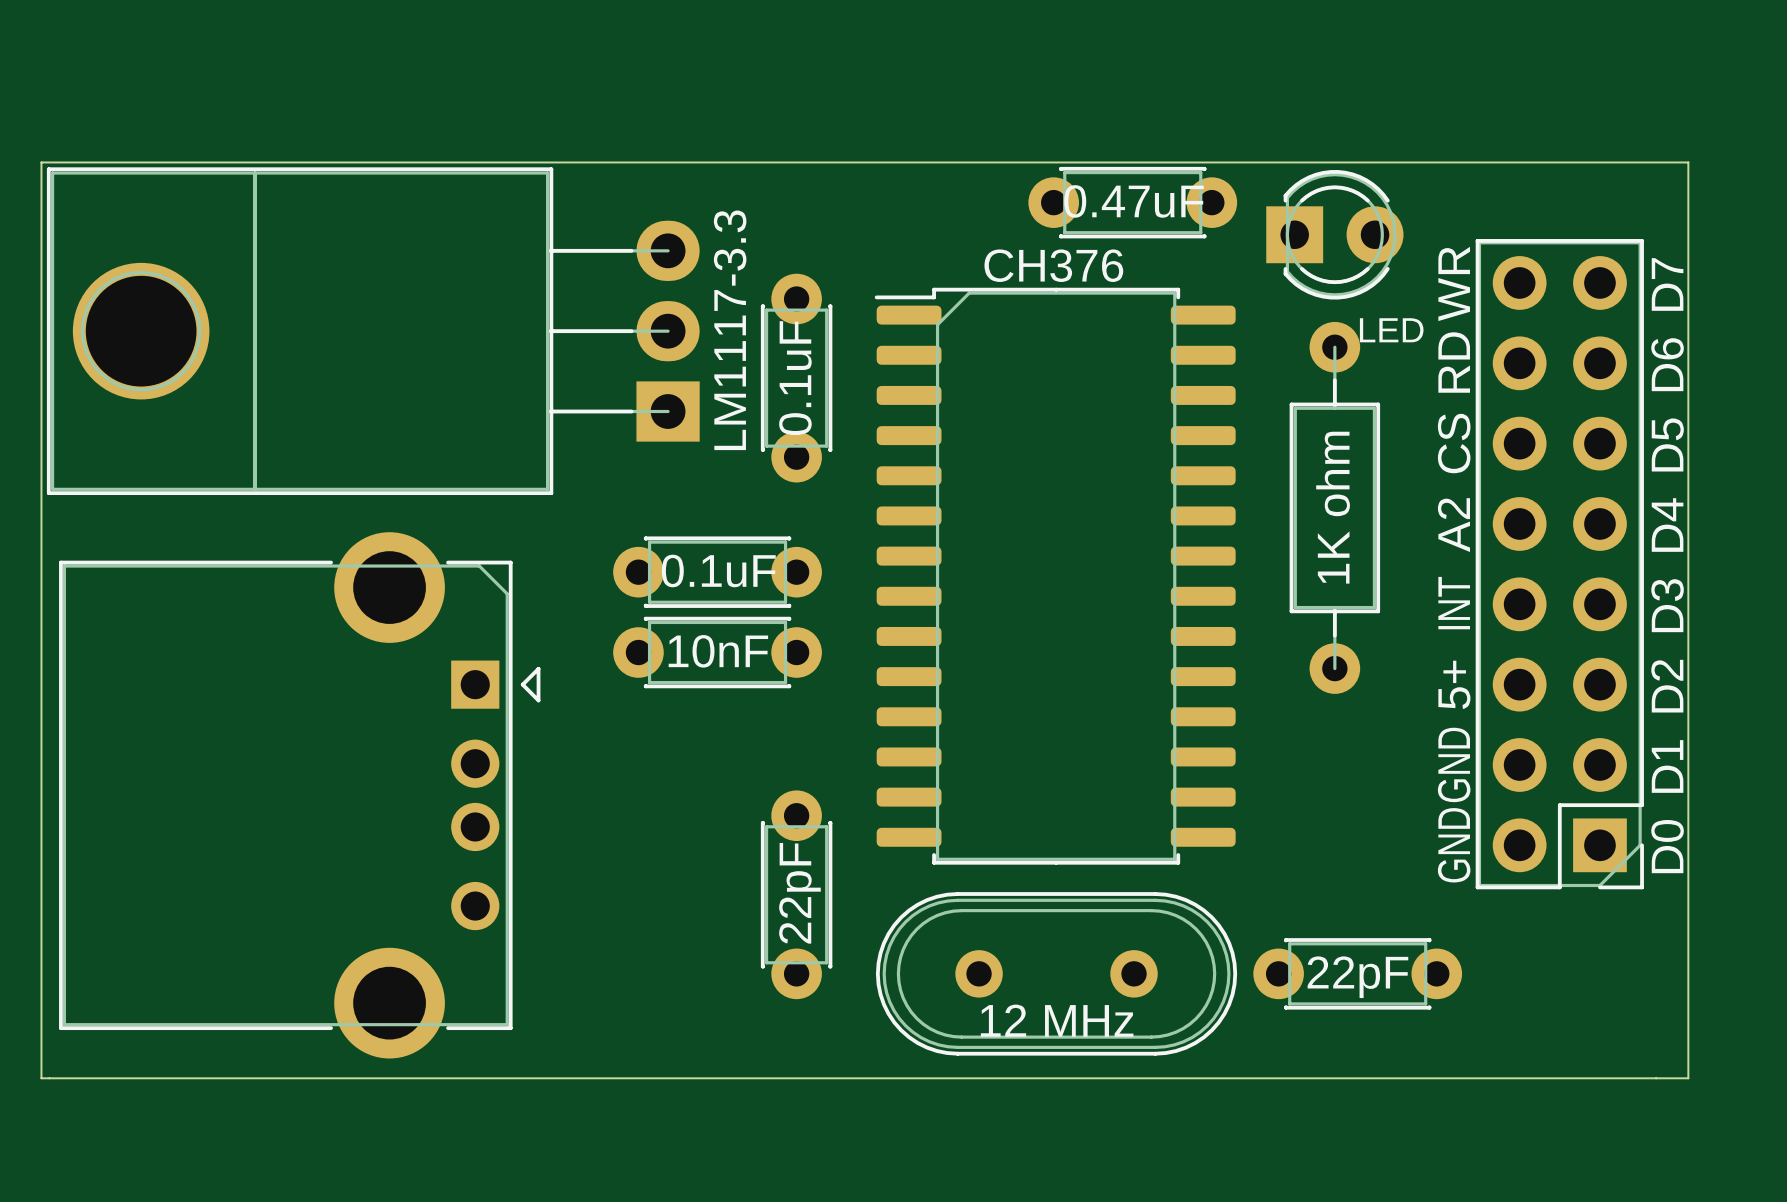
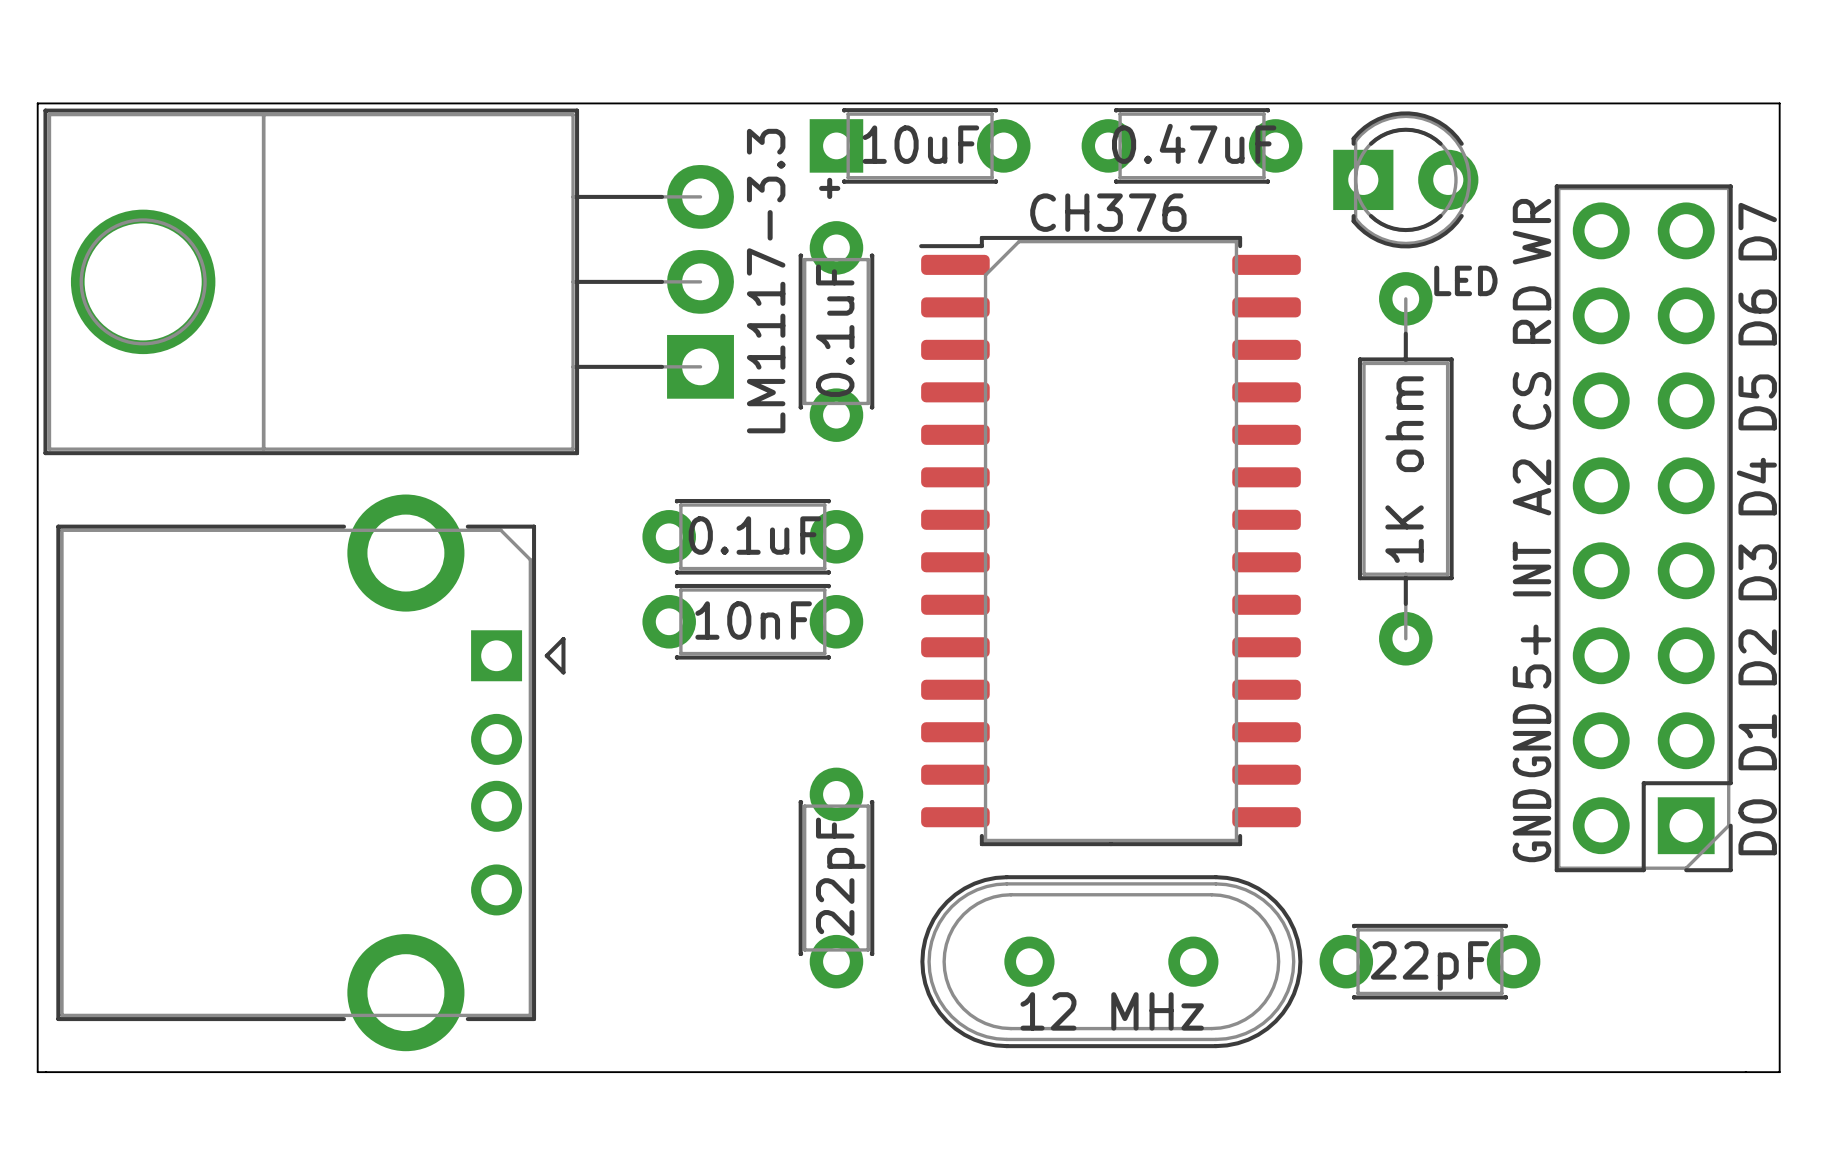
part: none -> 10uF (920, 145)
text: none -> + (829, 188)

